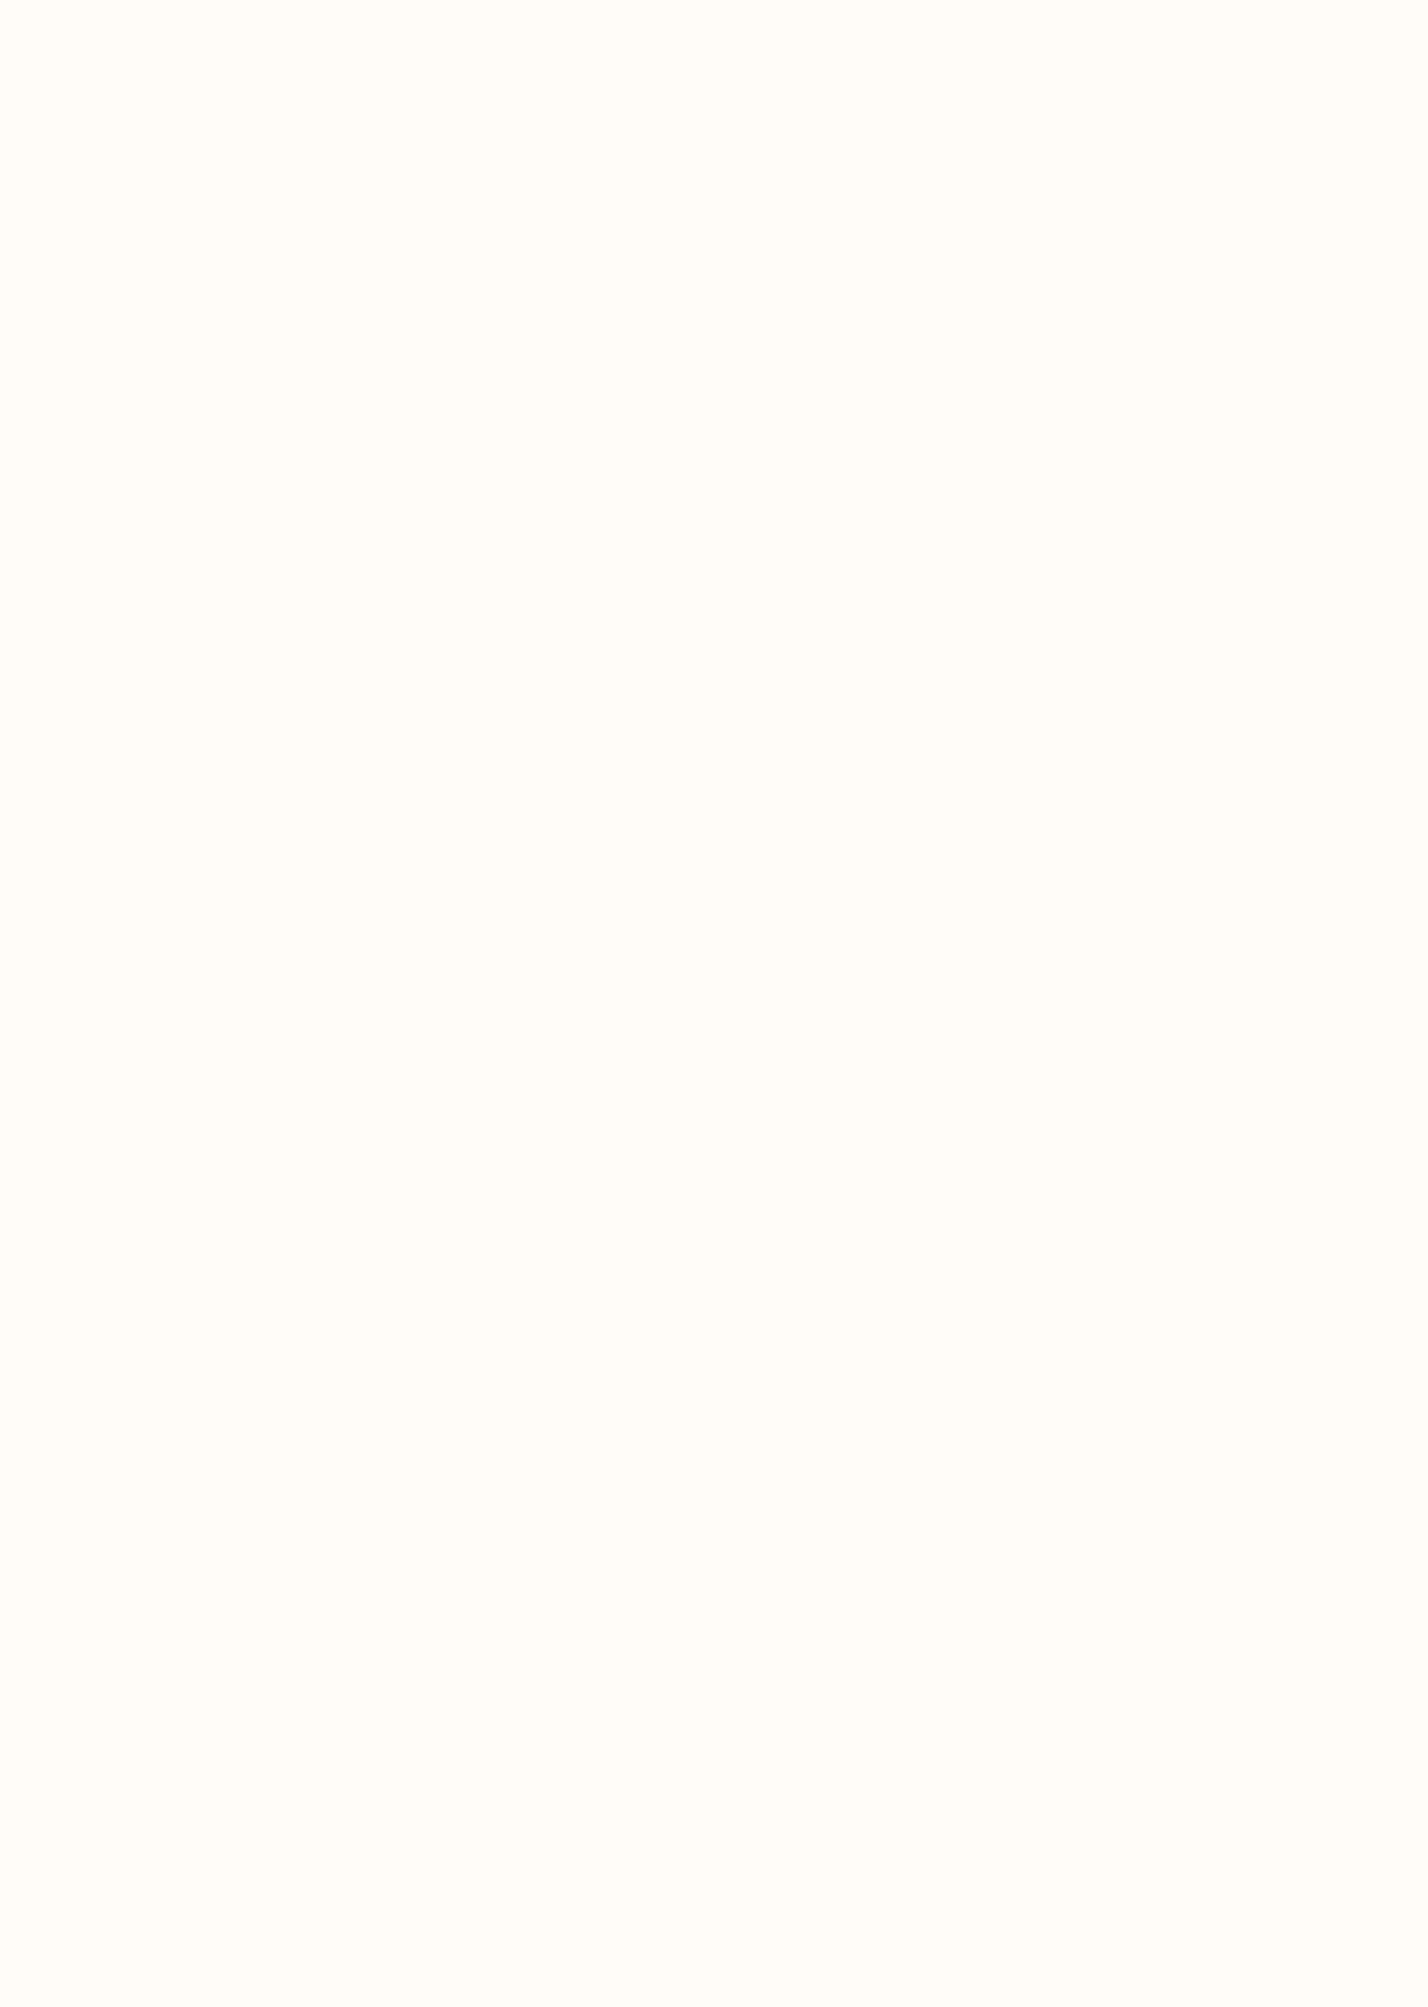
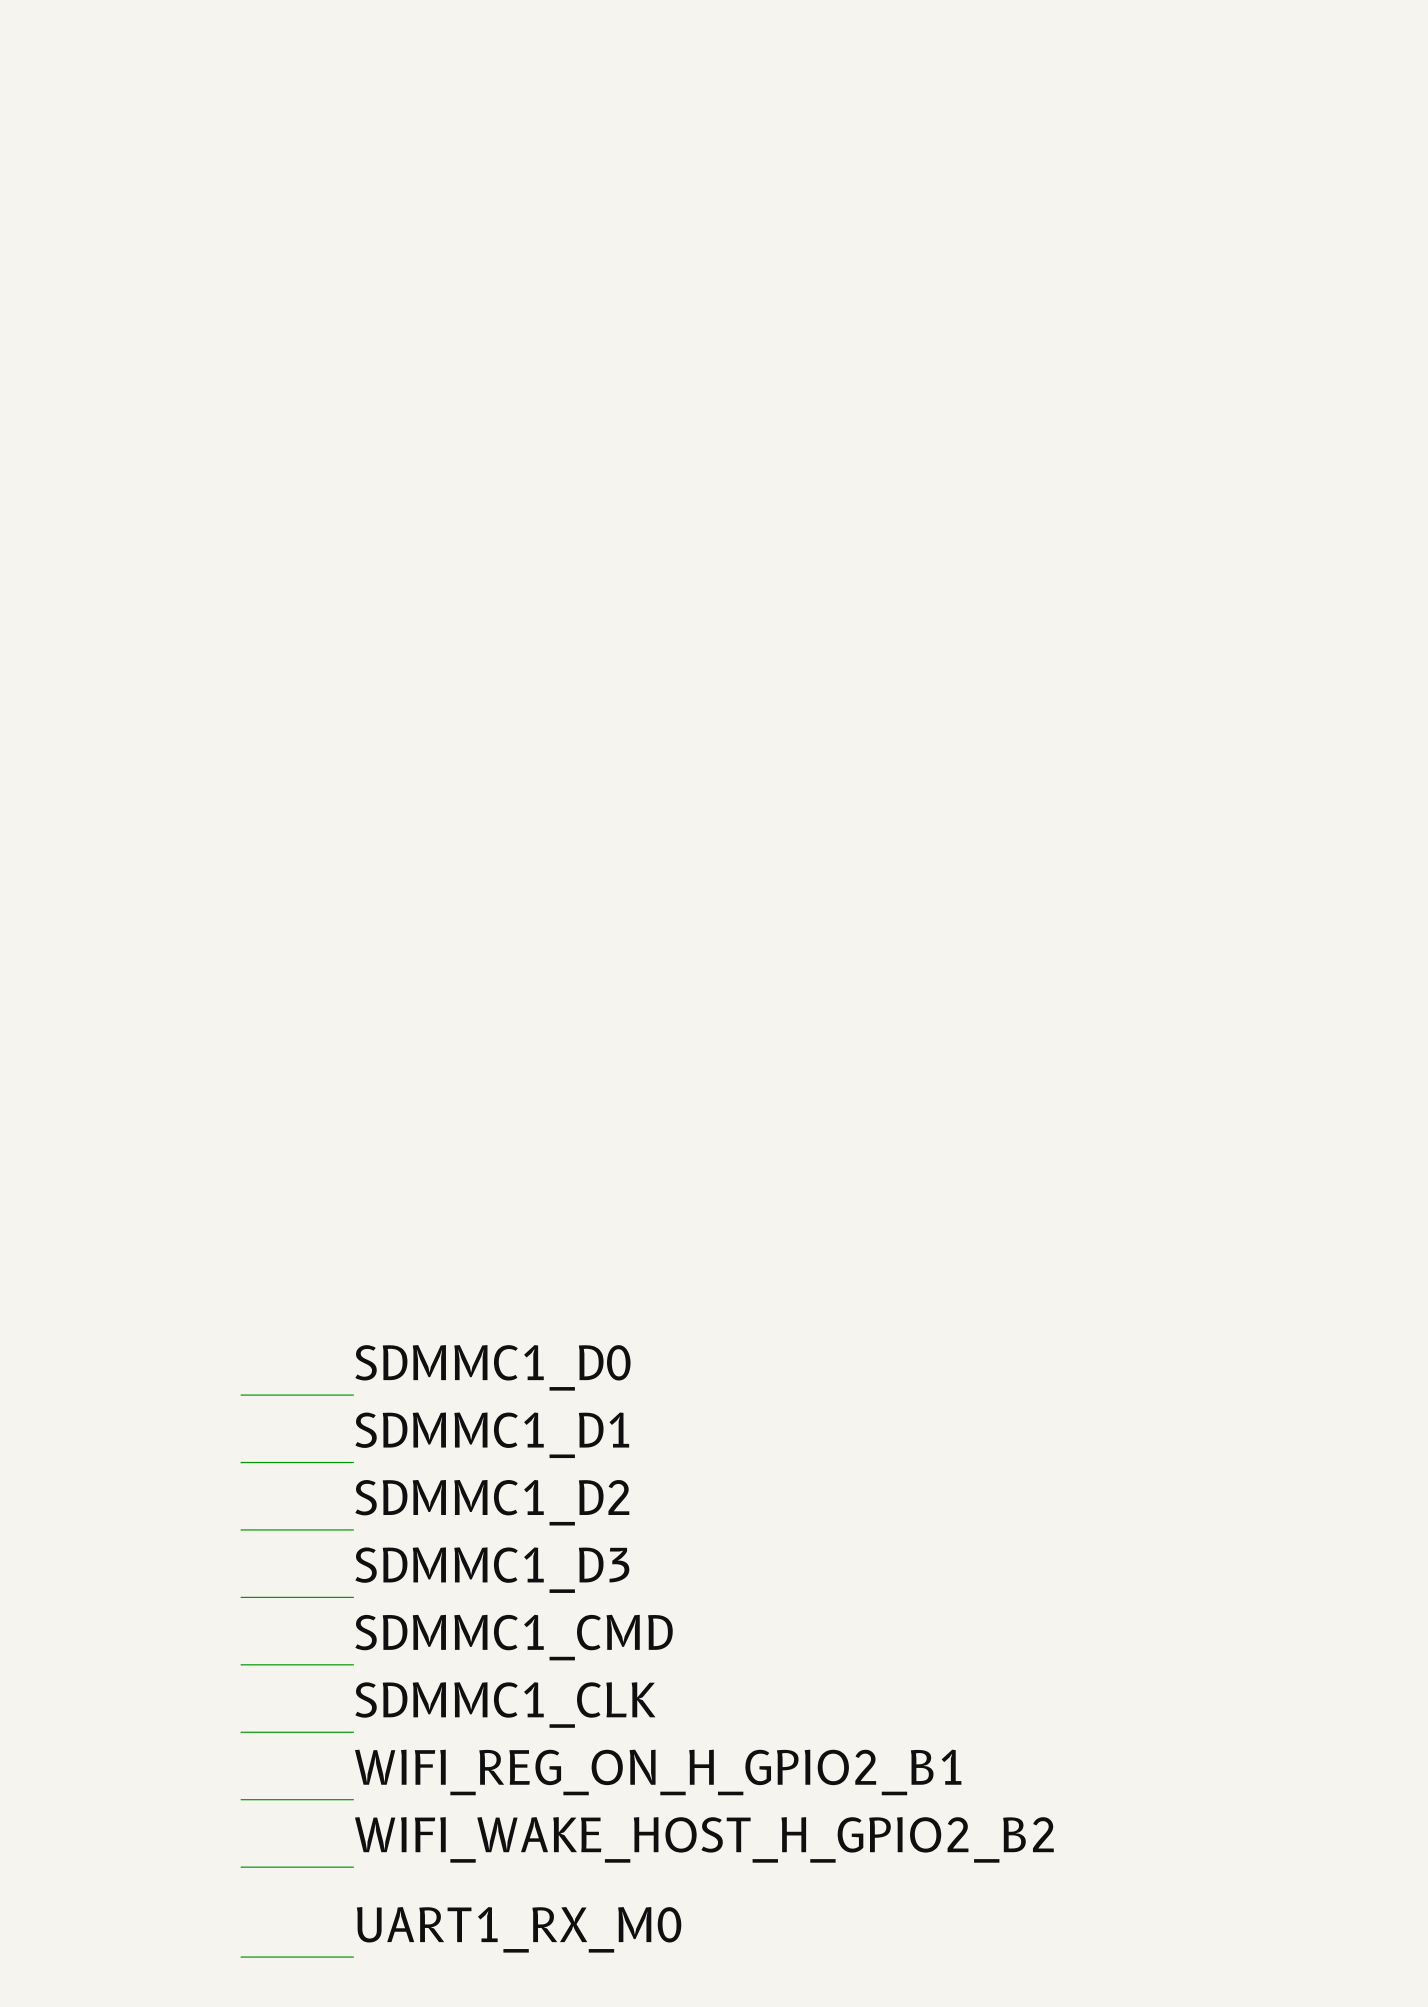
label: none -> SDMMC1_D0 (492, 1367)
wire: none -> (241, 1395) (353, 1395)
label: none -> SDMMC1_D1 (492, 1435)
wire: none -> (241, 1462) (353, 1462)
label: none -> SDMMC1_D2 (492, 1502)
wire: none -> (241, 1529) (353, 1529)
label: none -> SDMMC1_D3 (492, 1570)
wire: none -> (241, 1597) (353, 1597)
label: none -> SDMMC1_CMD (514, 1637)
wire: none -> (241, 1664) (353, 1664)
label: none -> SDMMC1_CLK (505, 1705)
wire: none -> (241, 1732) (353, 1732)
label: none -> WIFI_REG_ON_H_GPIO2_B1 (658, 1772)
wire: none -> (241, 1799) (353, 1799)
label: none -> WIFI_WAKE_HOST_H_GPIO2_B2 (704, 1839)
wire: none -> (241, 1867) (353, 1867)
label: none -> UART1_RX_M0 (519, 1929)
wire: none -> (241, 1957) (353, 1957)

